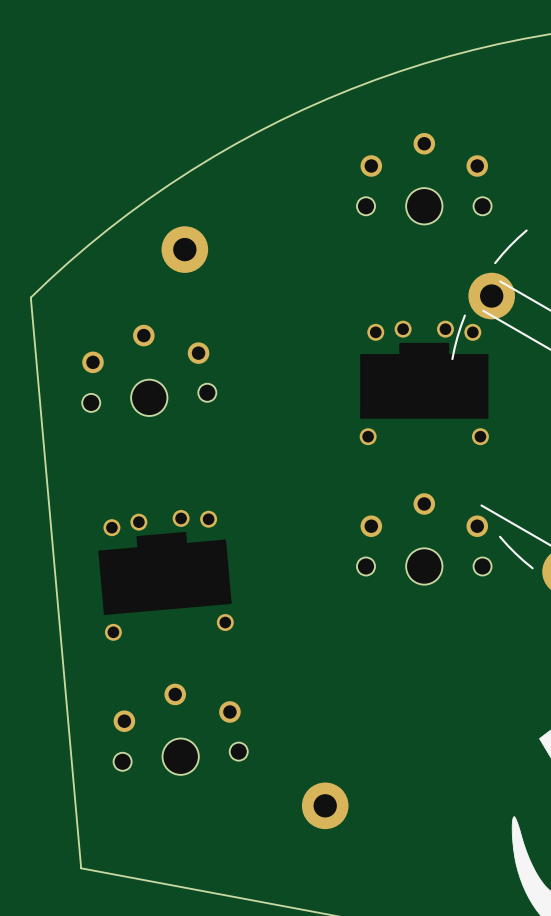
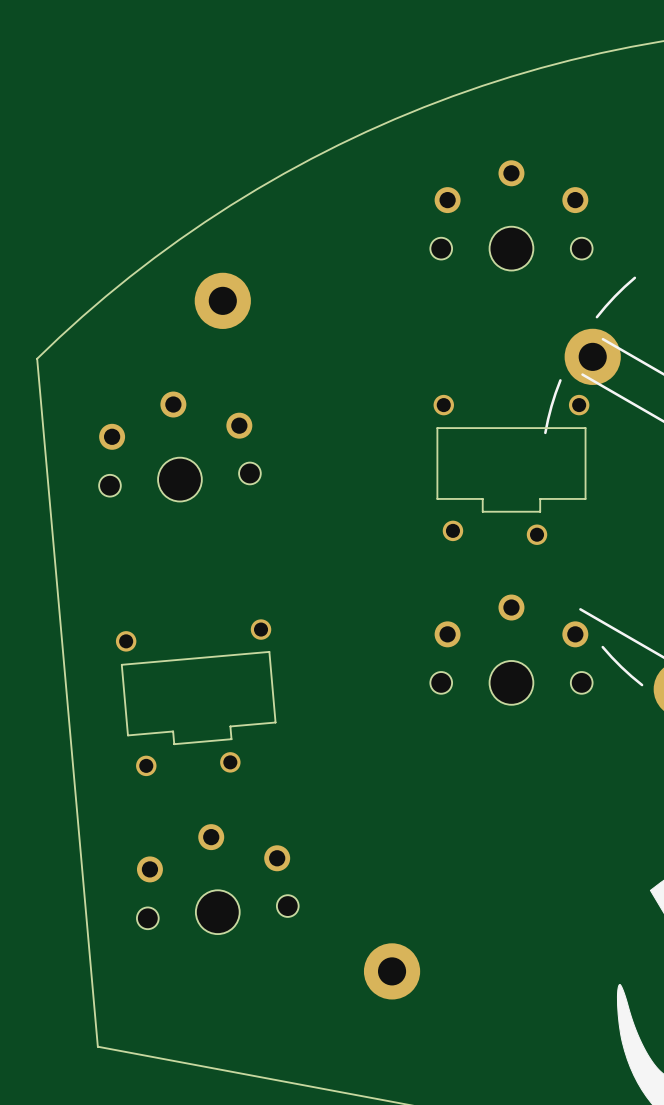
part footprint: [359, 320, 489, 446] -> [433, 394, 590, 545]
part footprint: [98, 509, 234, 641] -> [115, 619, 277, 777]

